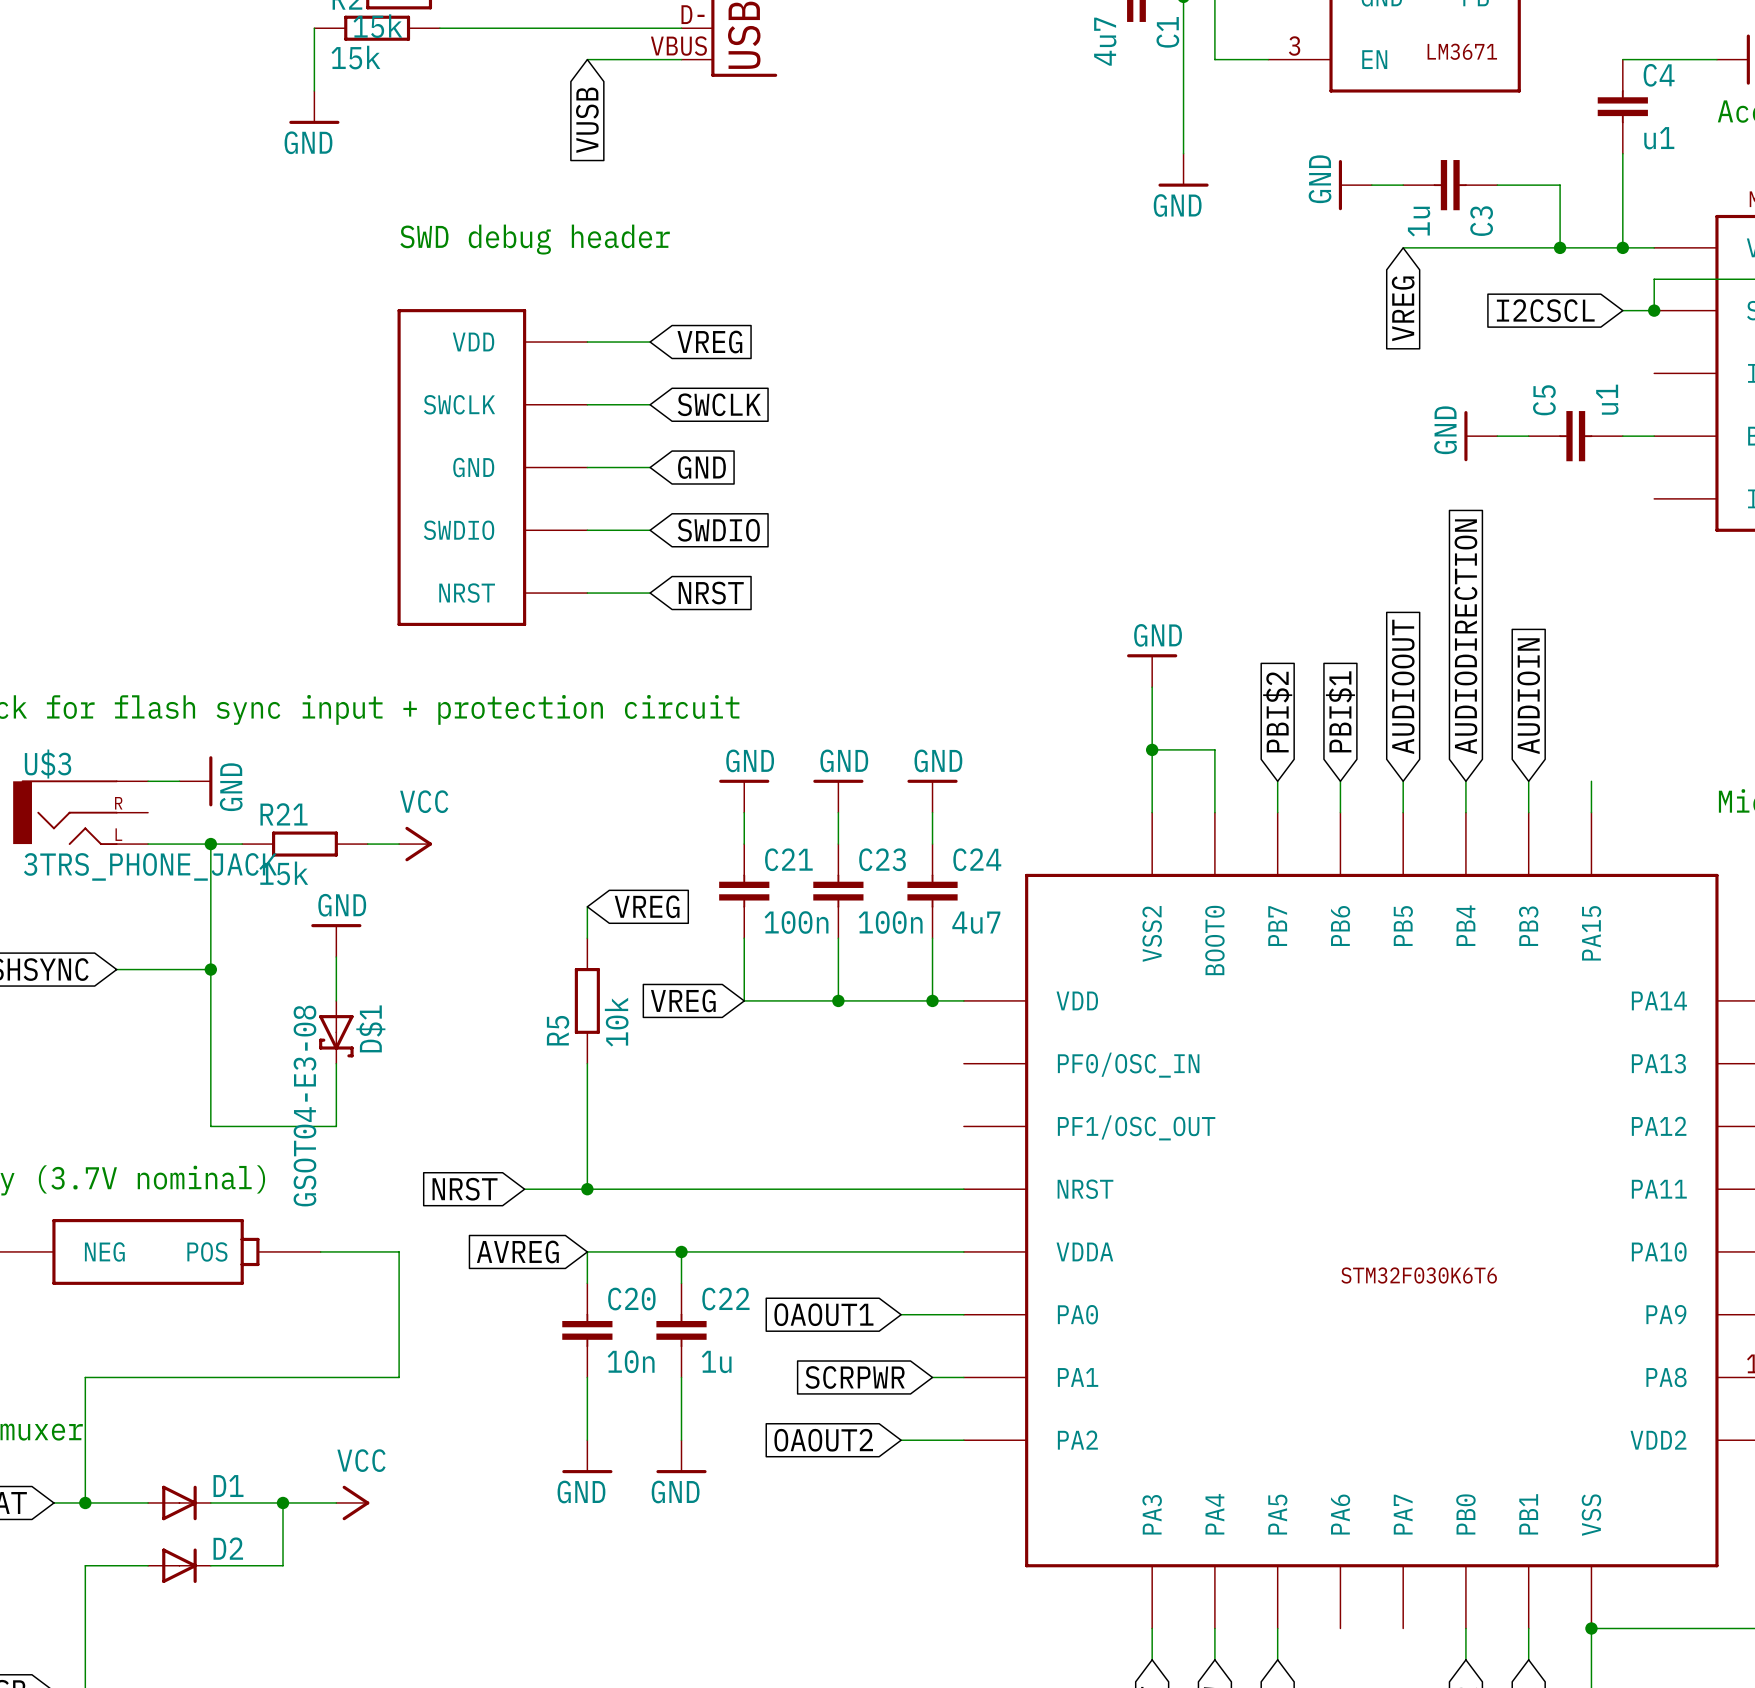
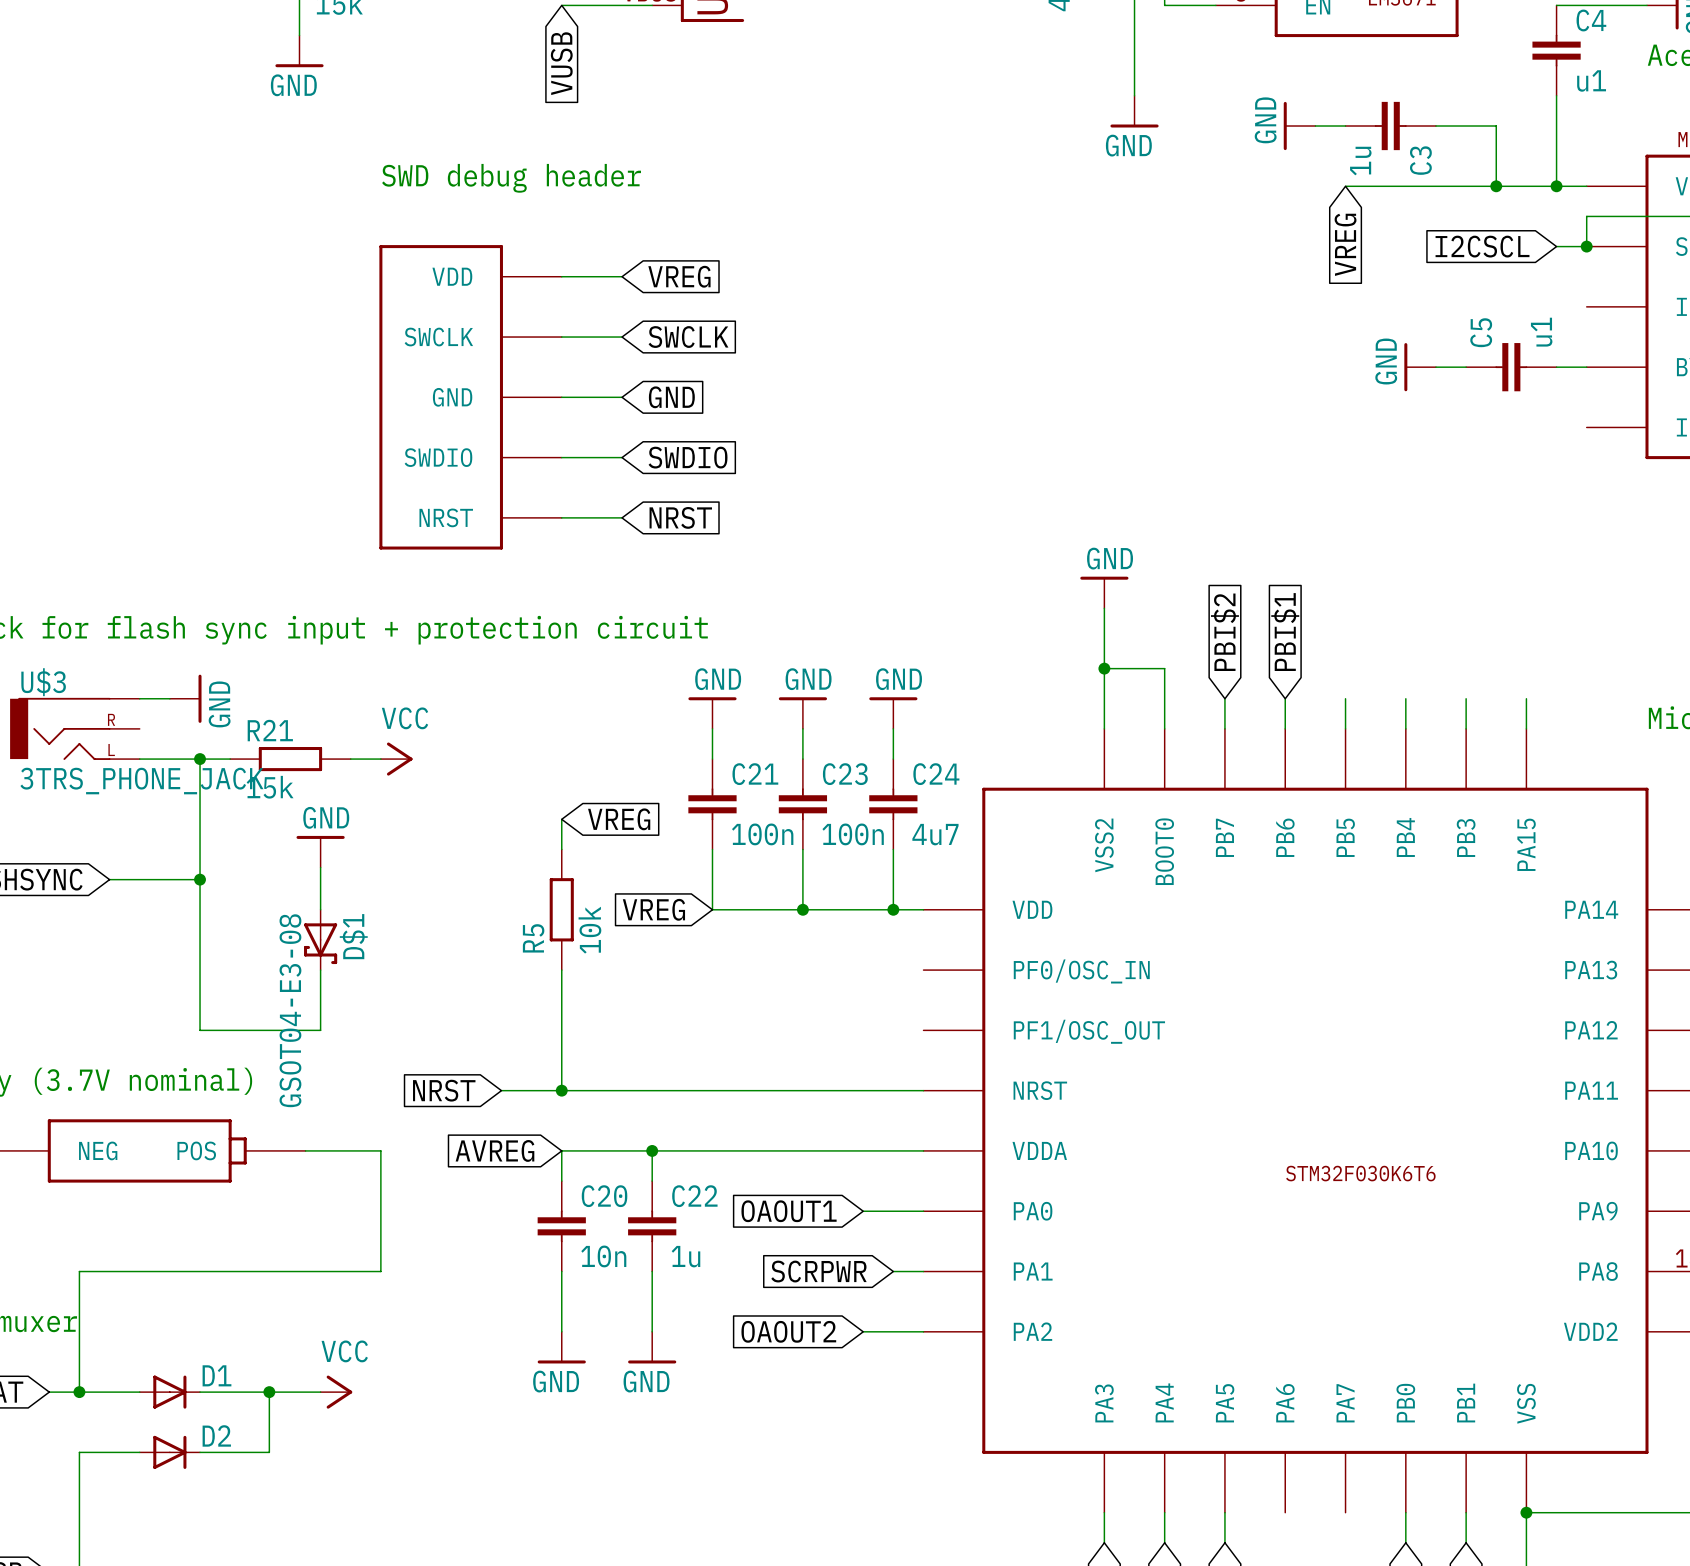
global label: AUDIODIRECTION (1465, 636) -> none
global label: AUDIOOUT (1403, 686) -> none
global label: AUDIOIN (1528, 696) -> none

